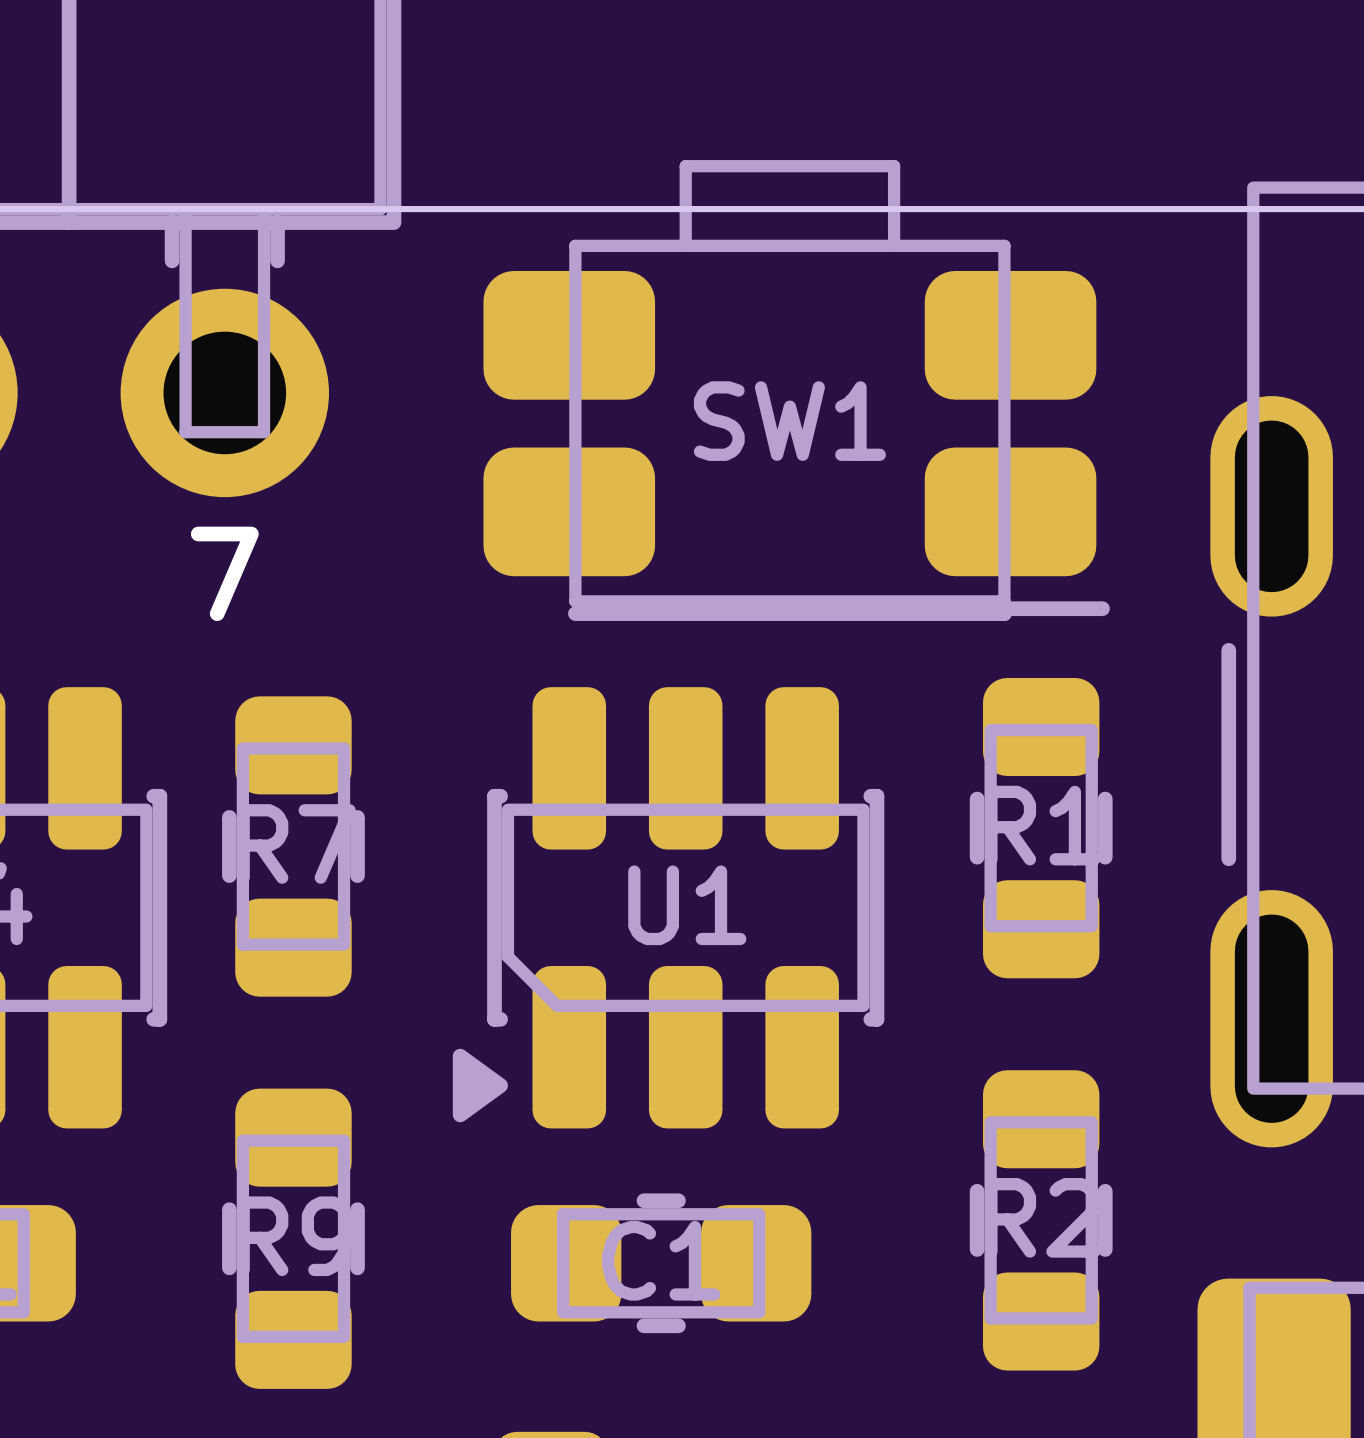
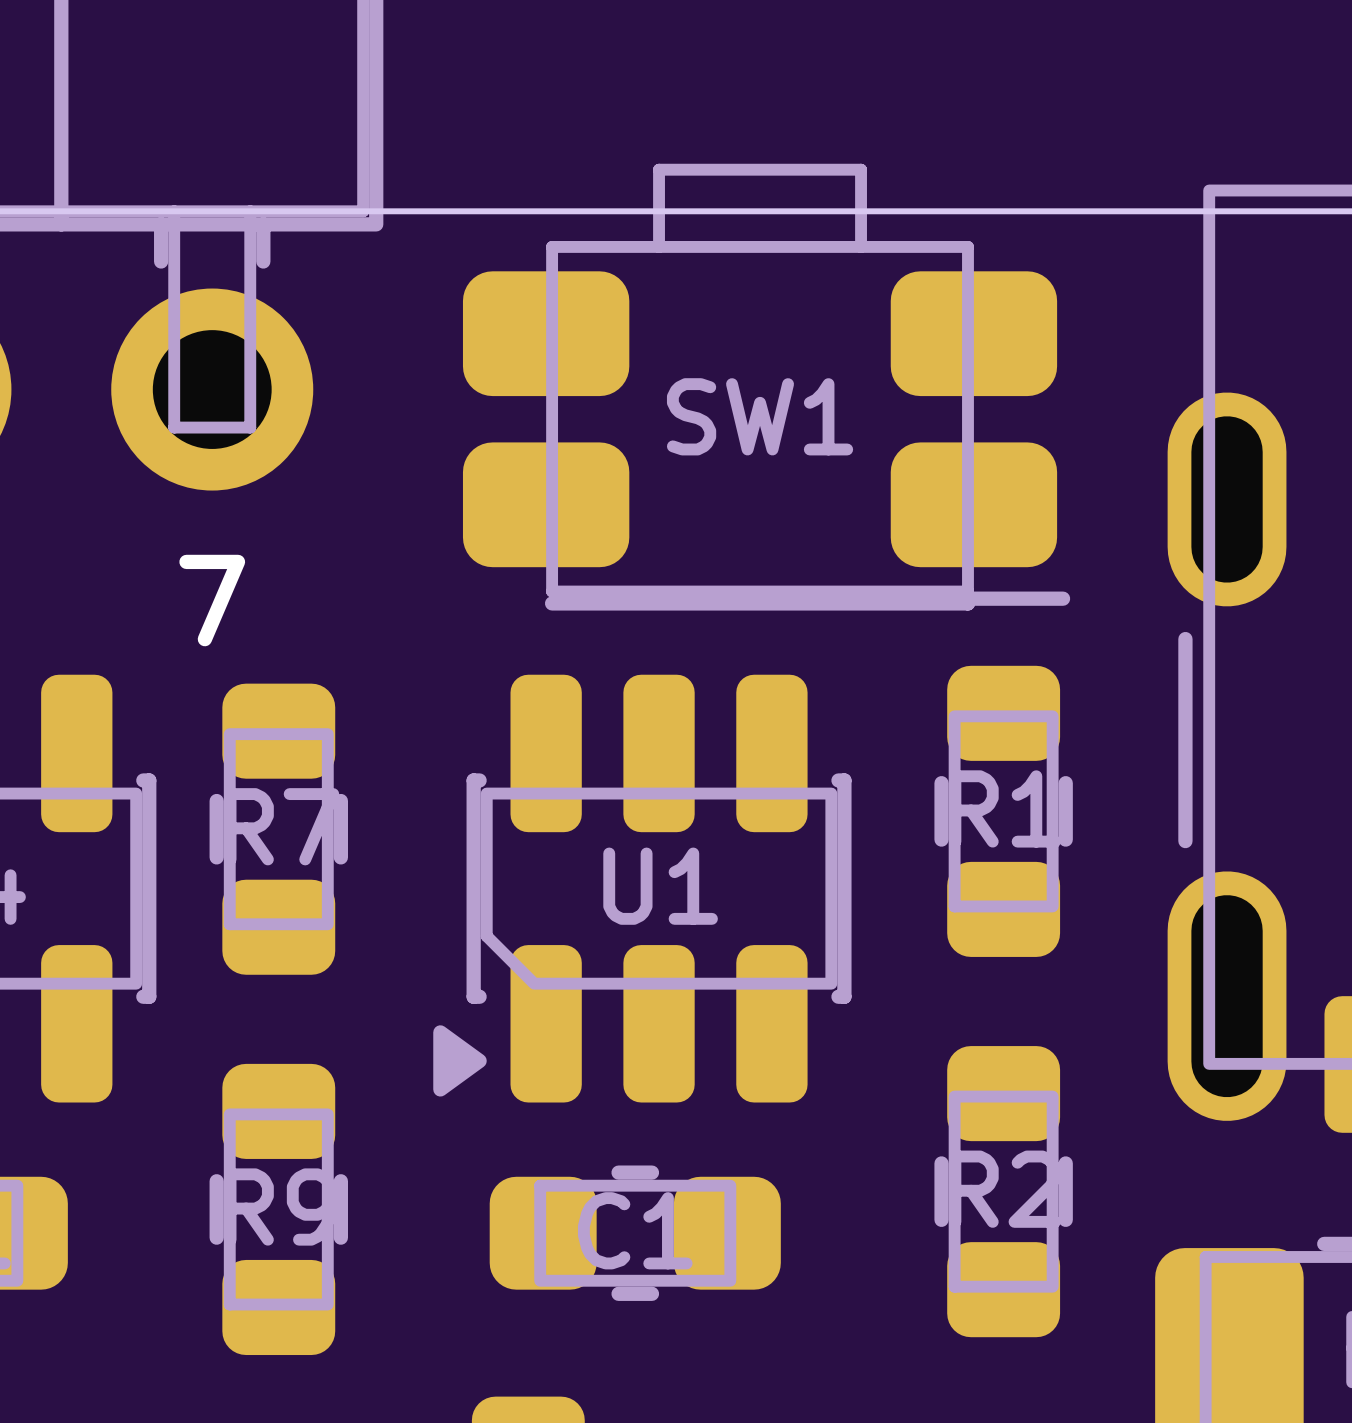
text position: 7 (224, 573) -> 7 (212, 600)

